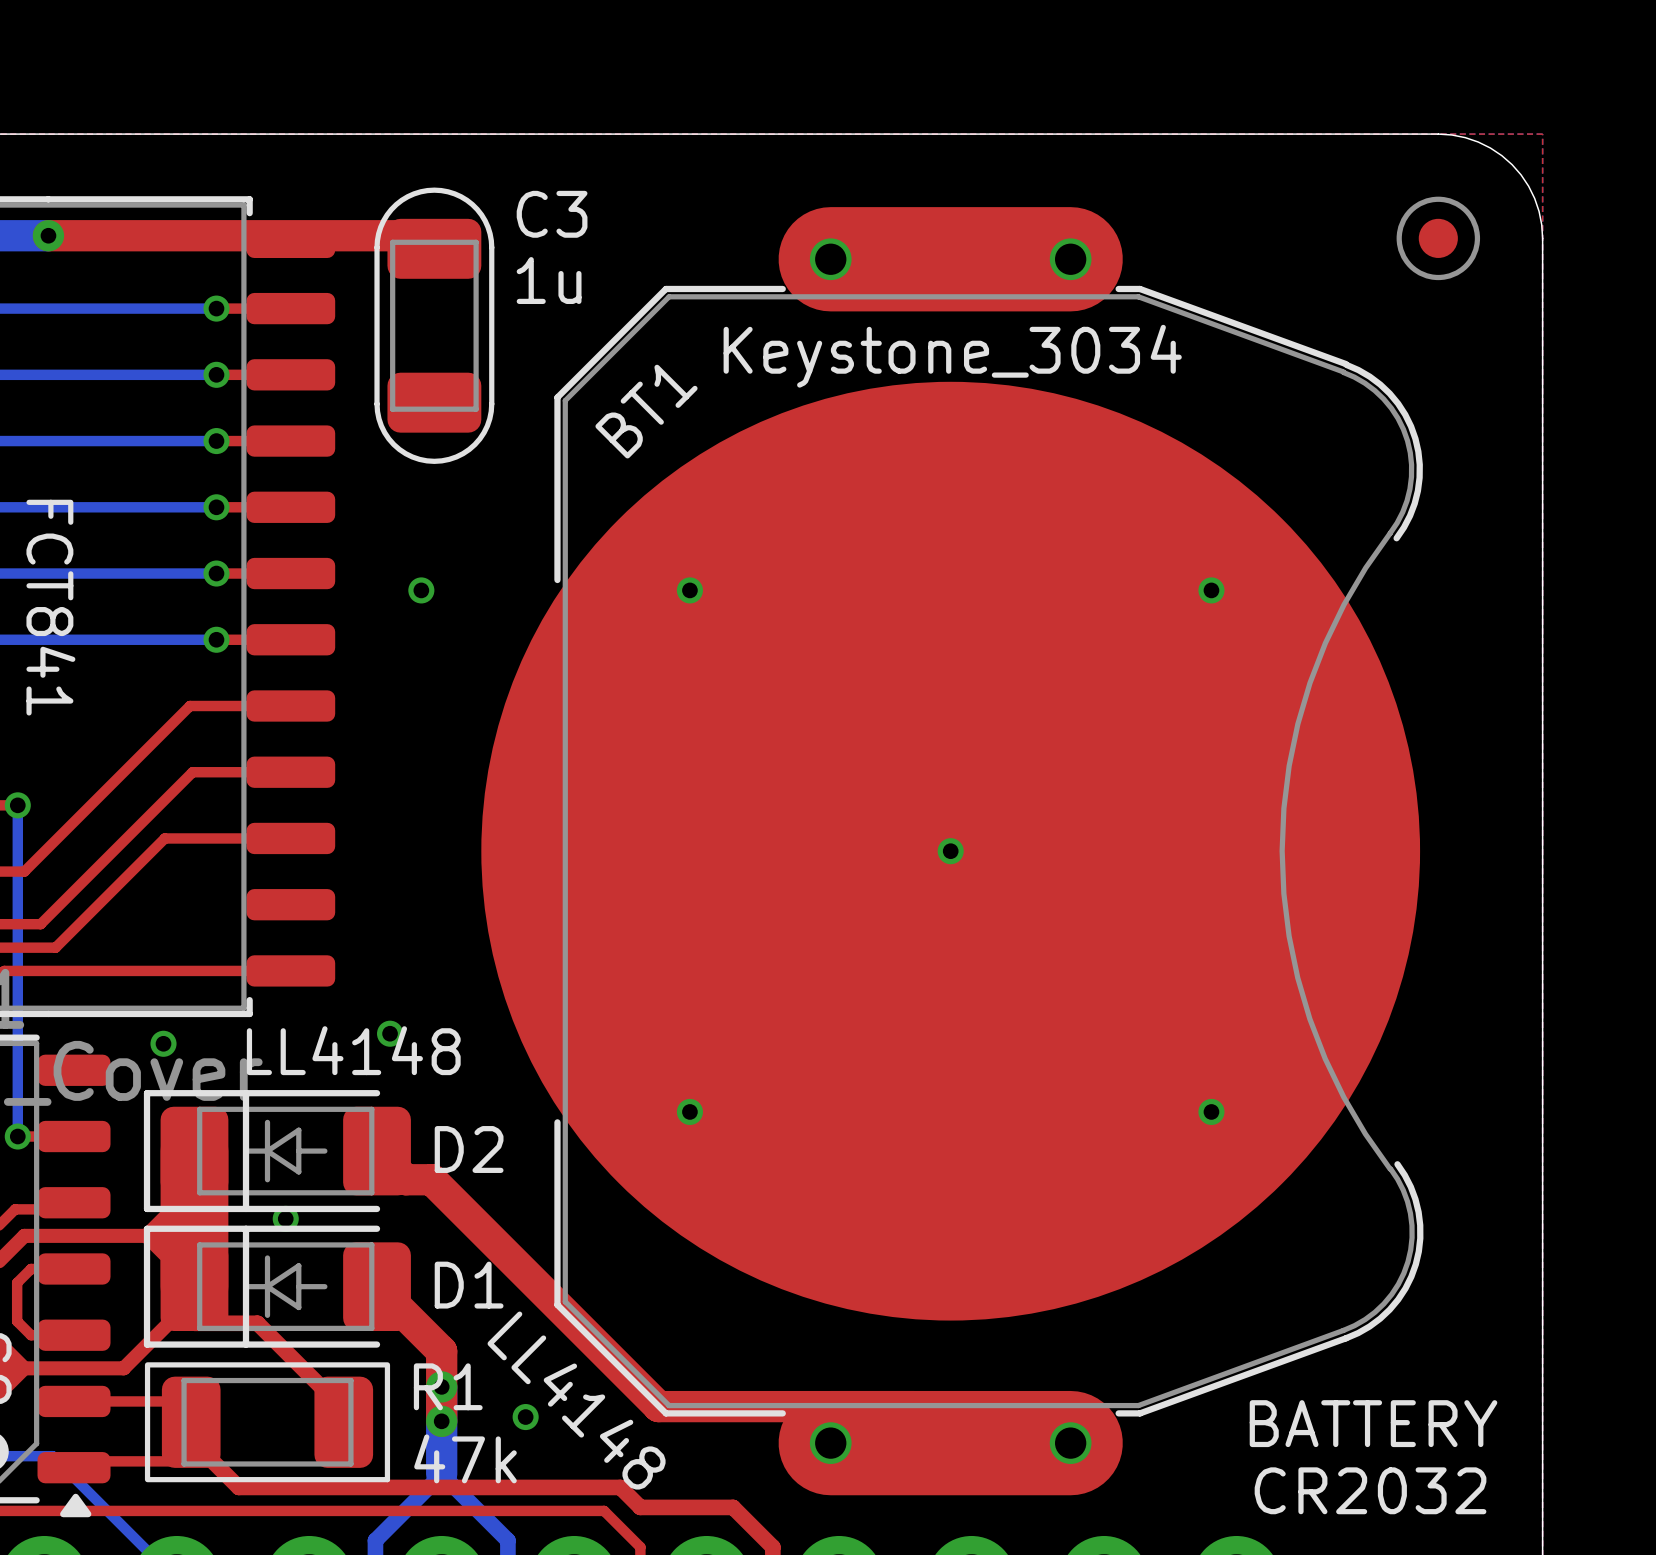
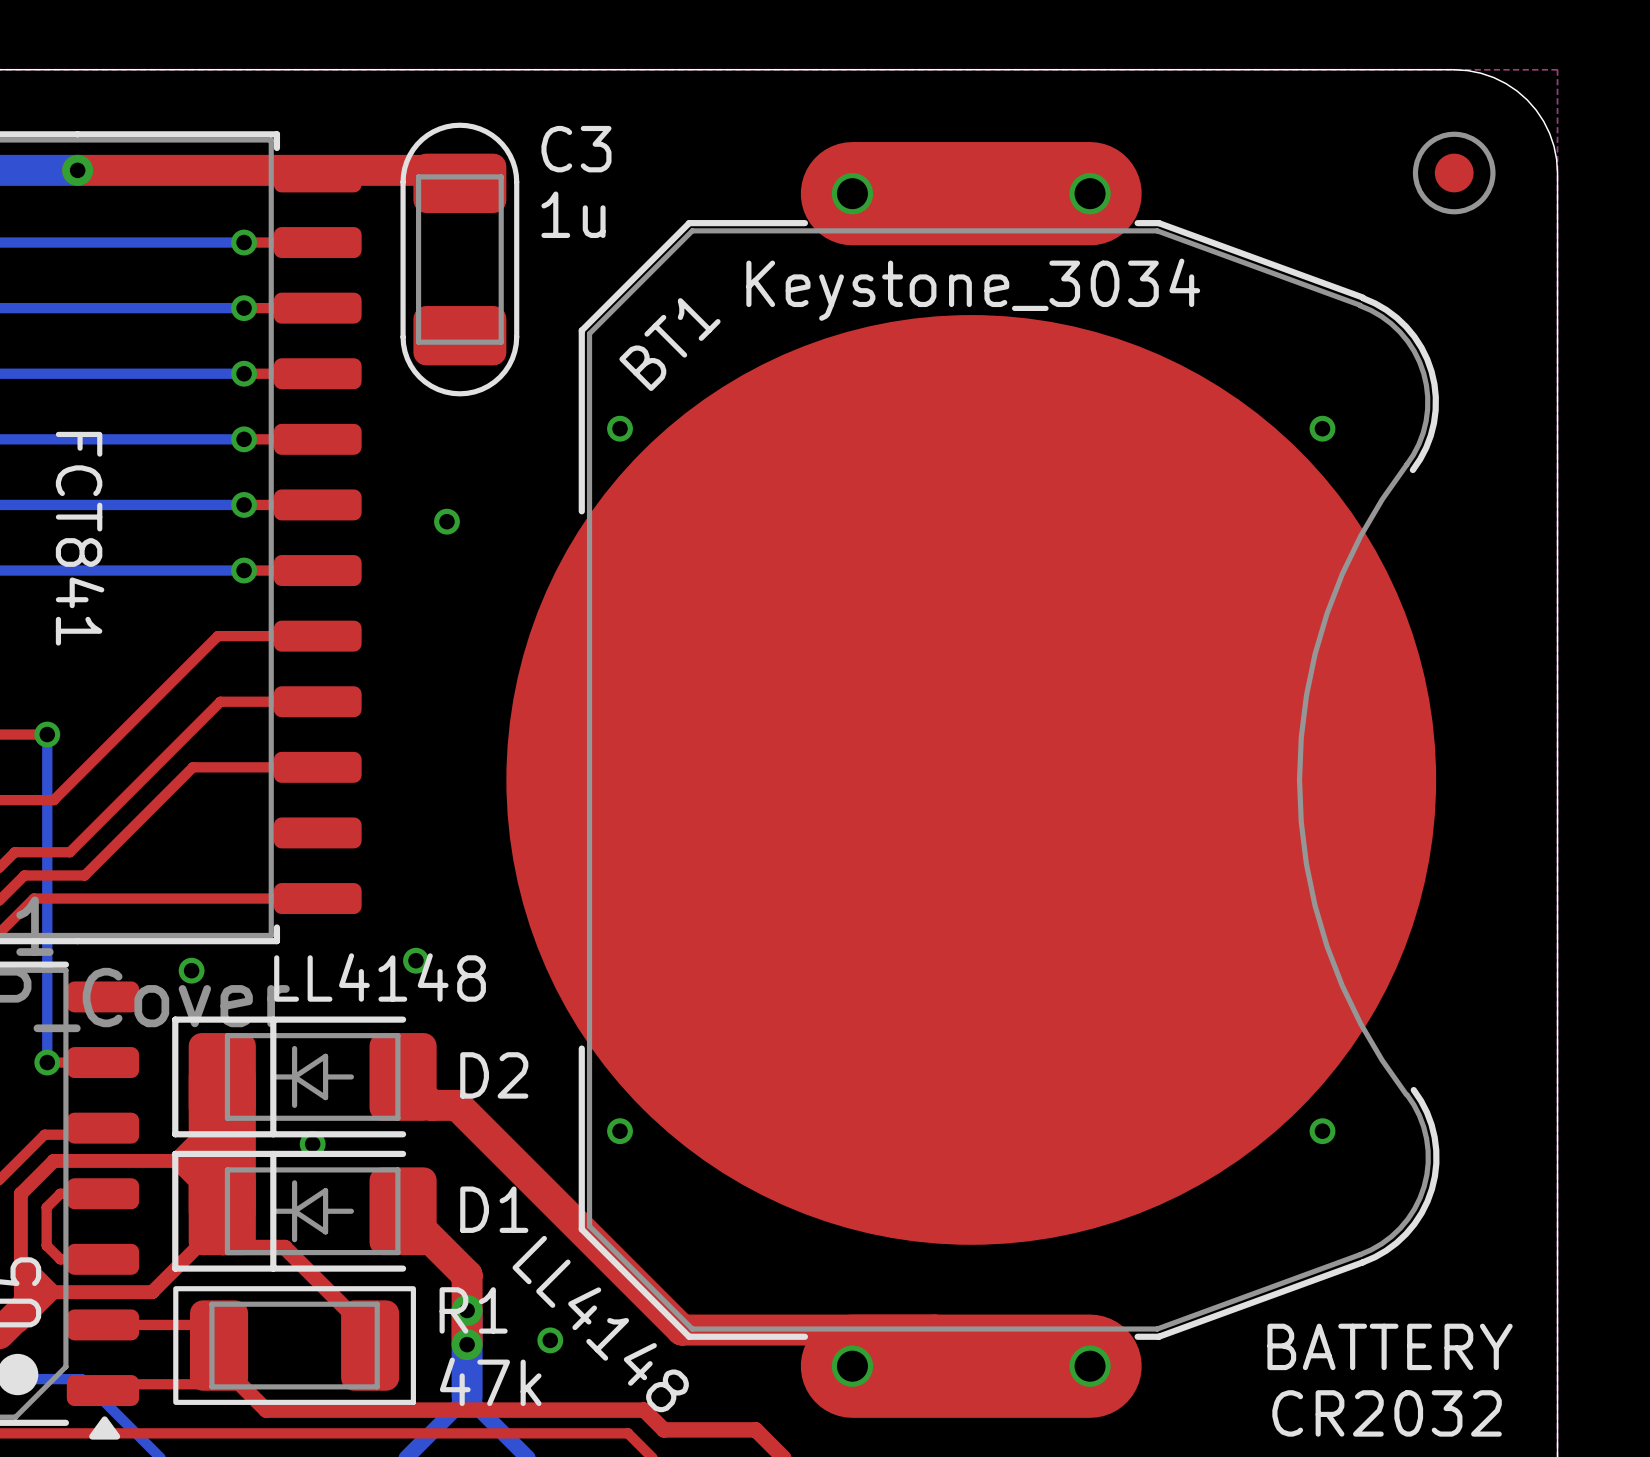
via position: (689, 590) -> (620, 428)
via position: (1211, 590) -> (1322, 428)
via: (950, 851) -> none
via position: (689, 1111) -> (620, 1131)
via position: (1211, 1111) -> (1322, 1131)

